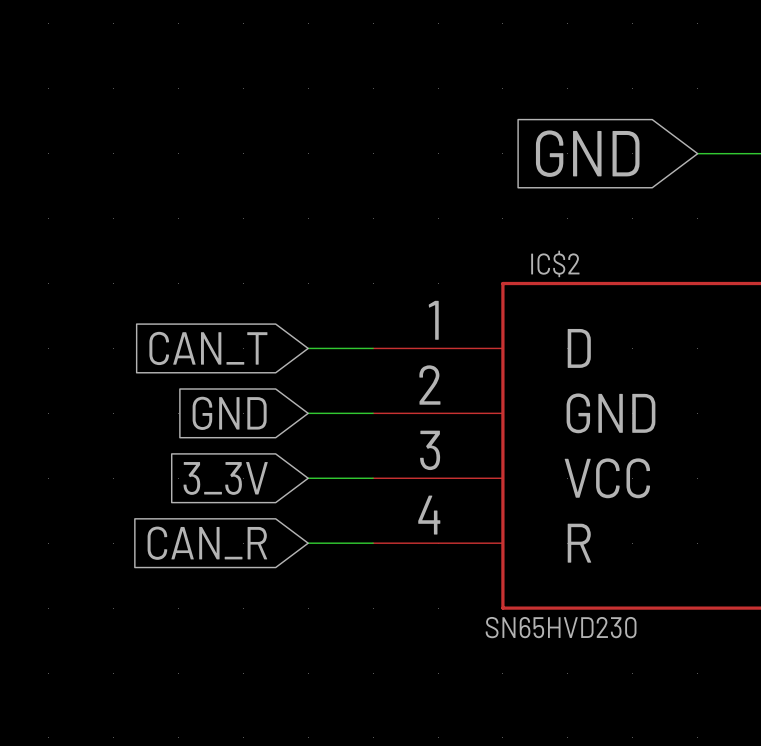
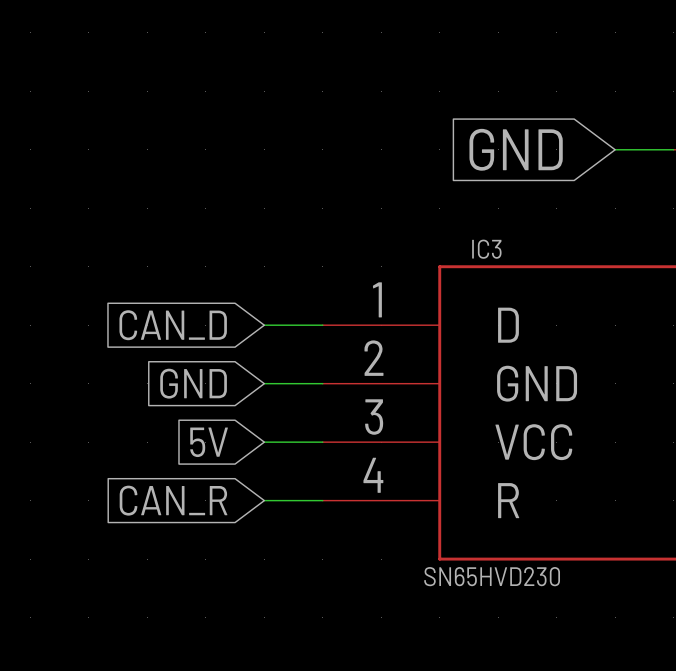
IC$2 name: IC$2 (555, 263) -> IC3 (486, 249)
global label: CAN_T (208, 348) -> CAN_D (173, 325)
global label: 3_3V (225, 478) -> 5V (209, 442)

